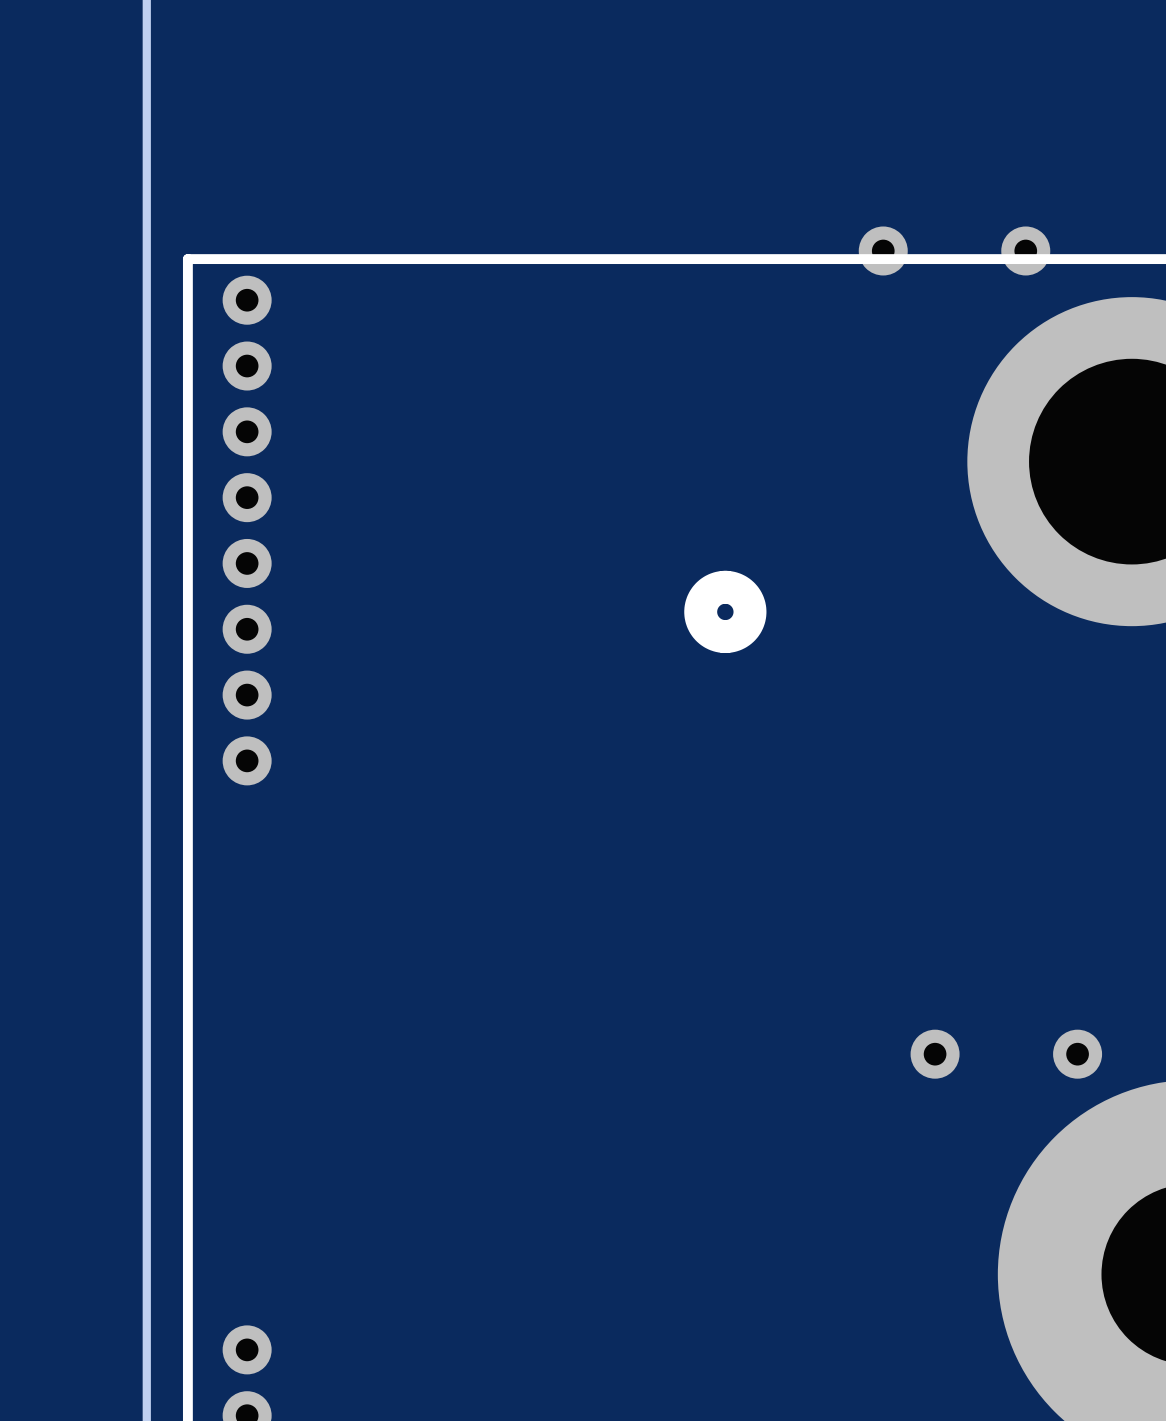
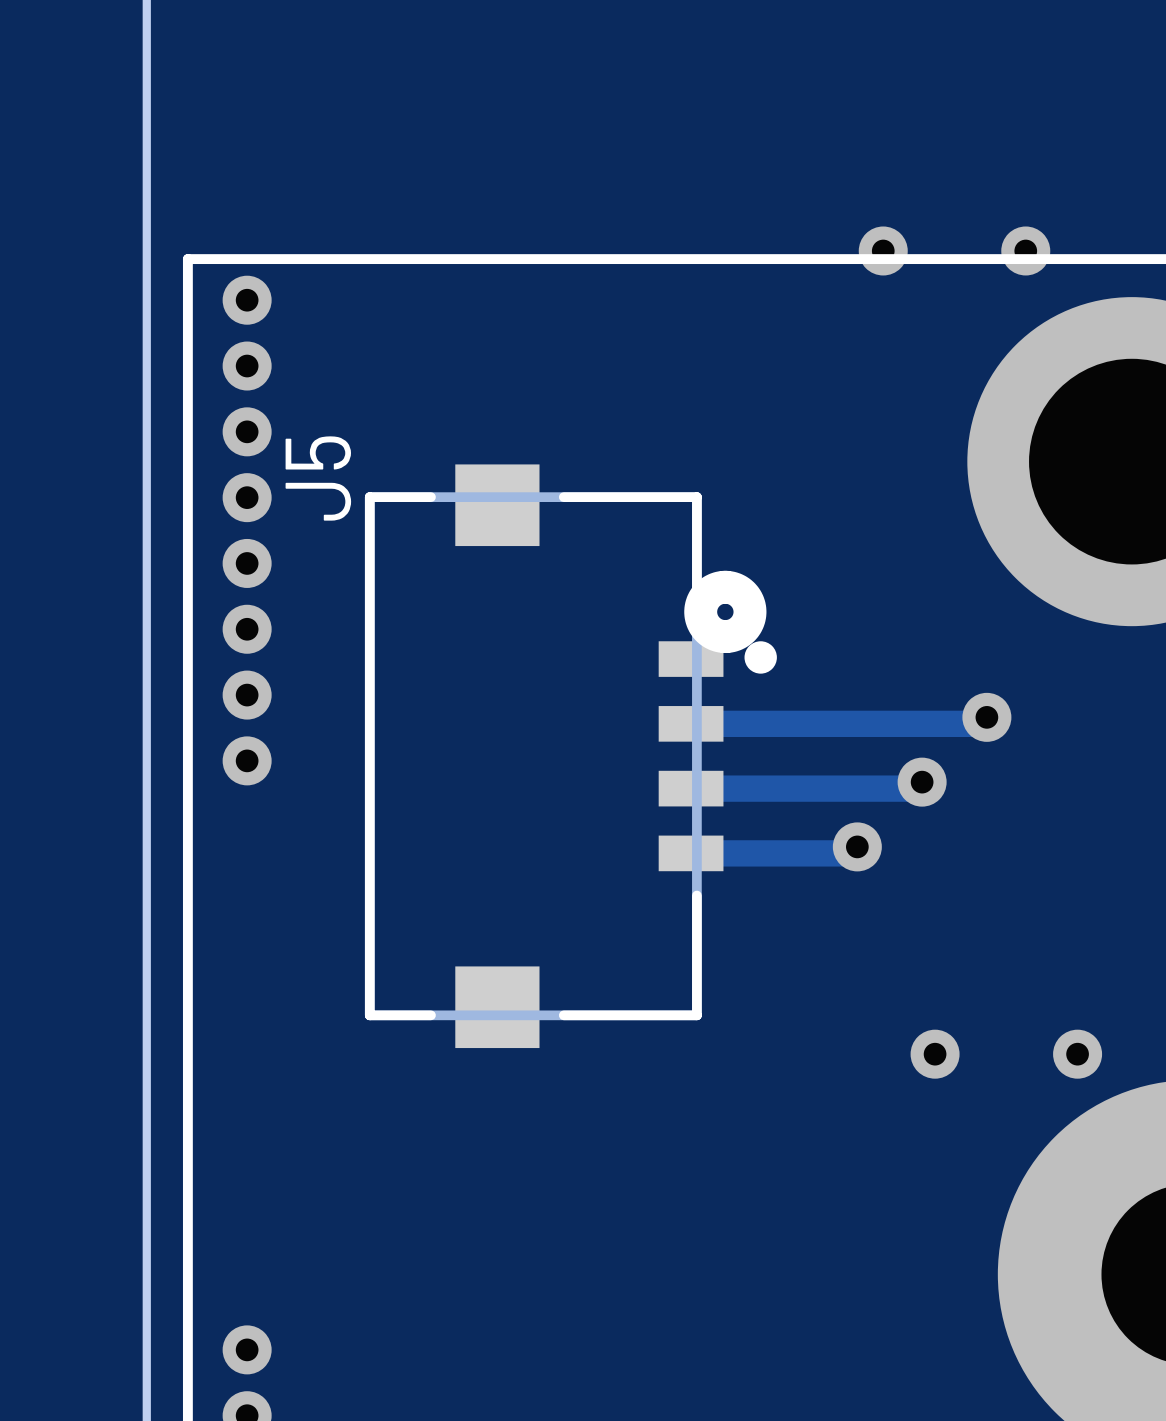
track: none -> (986, 717) (980, 723) (691, 723)
via: none -> (986, 717)
J5: none -> (570, 756)
track: none -> (922, 782) (915, 788) (691, 788)
via: none -> (922, 782)
track: none -> (857, 846) (850, 853) (691, 853)
via: none -> (857, 846)

